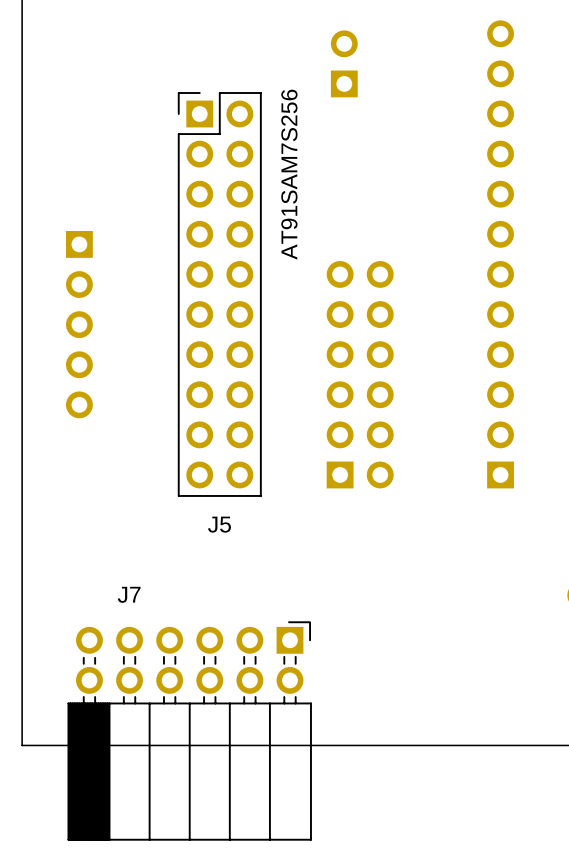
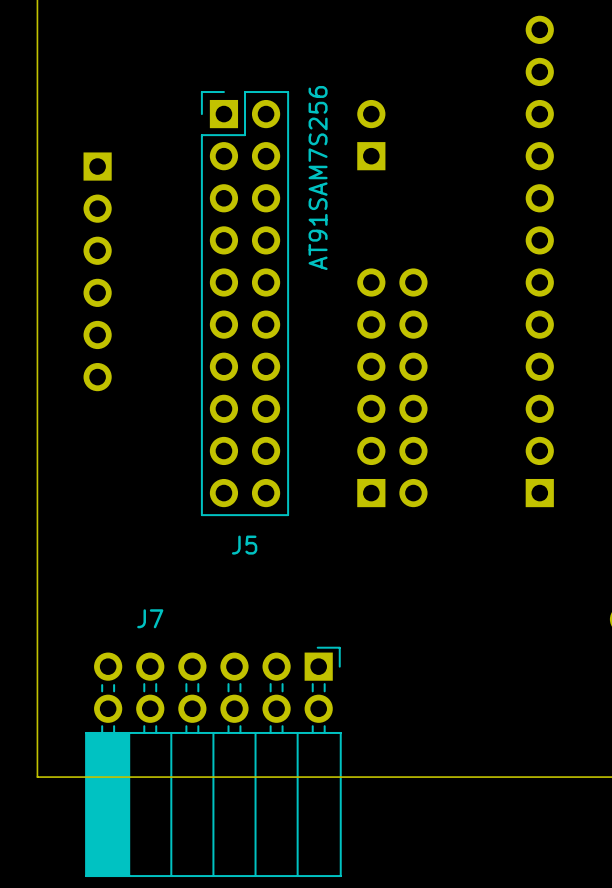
part position: (344, 63) -> (371, 135)
part: none -> (97, 271)
part: (79, 324) -> none

